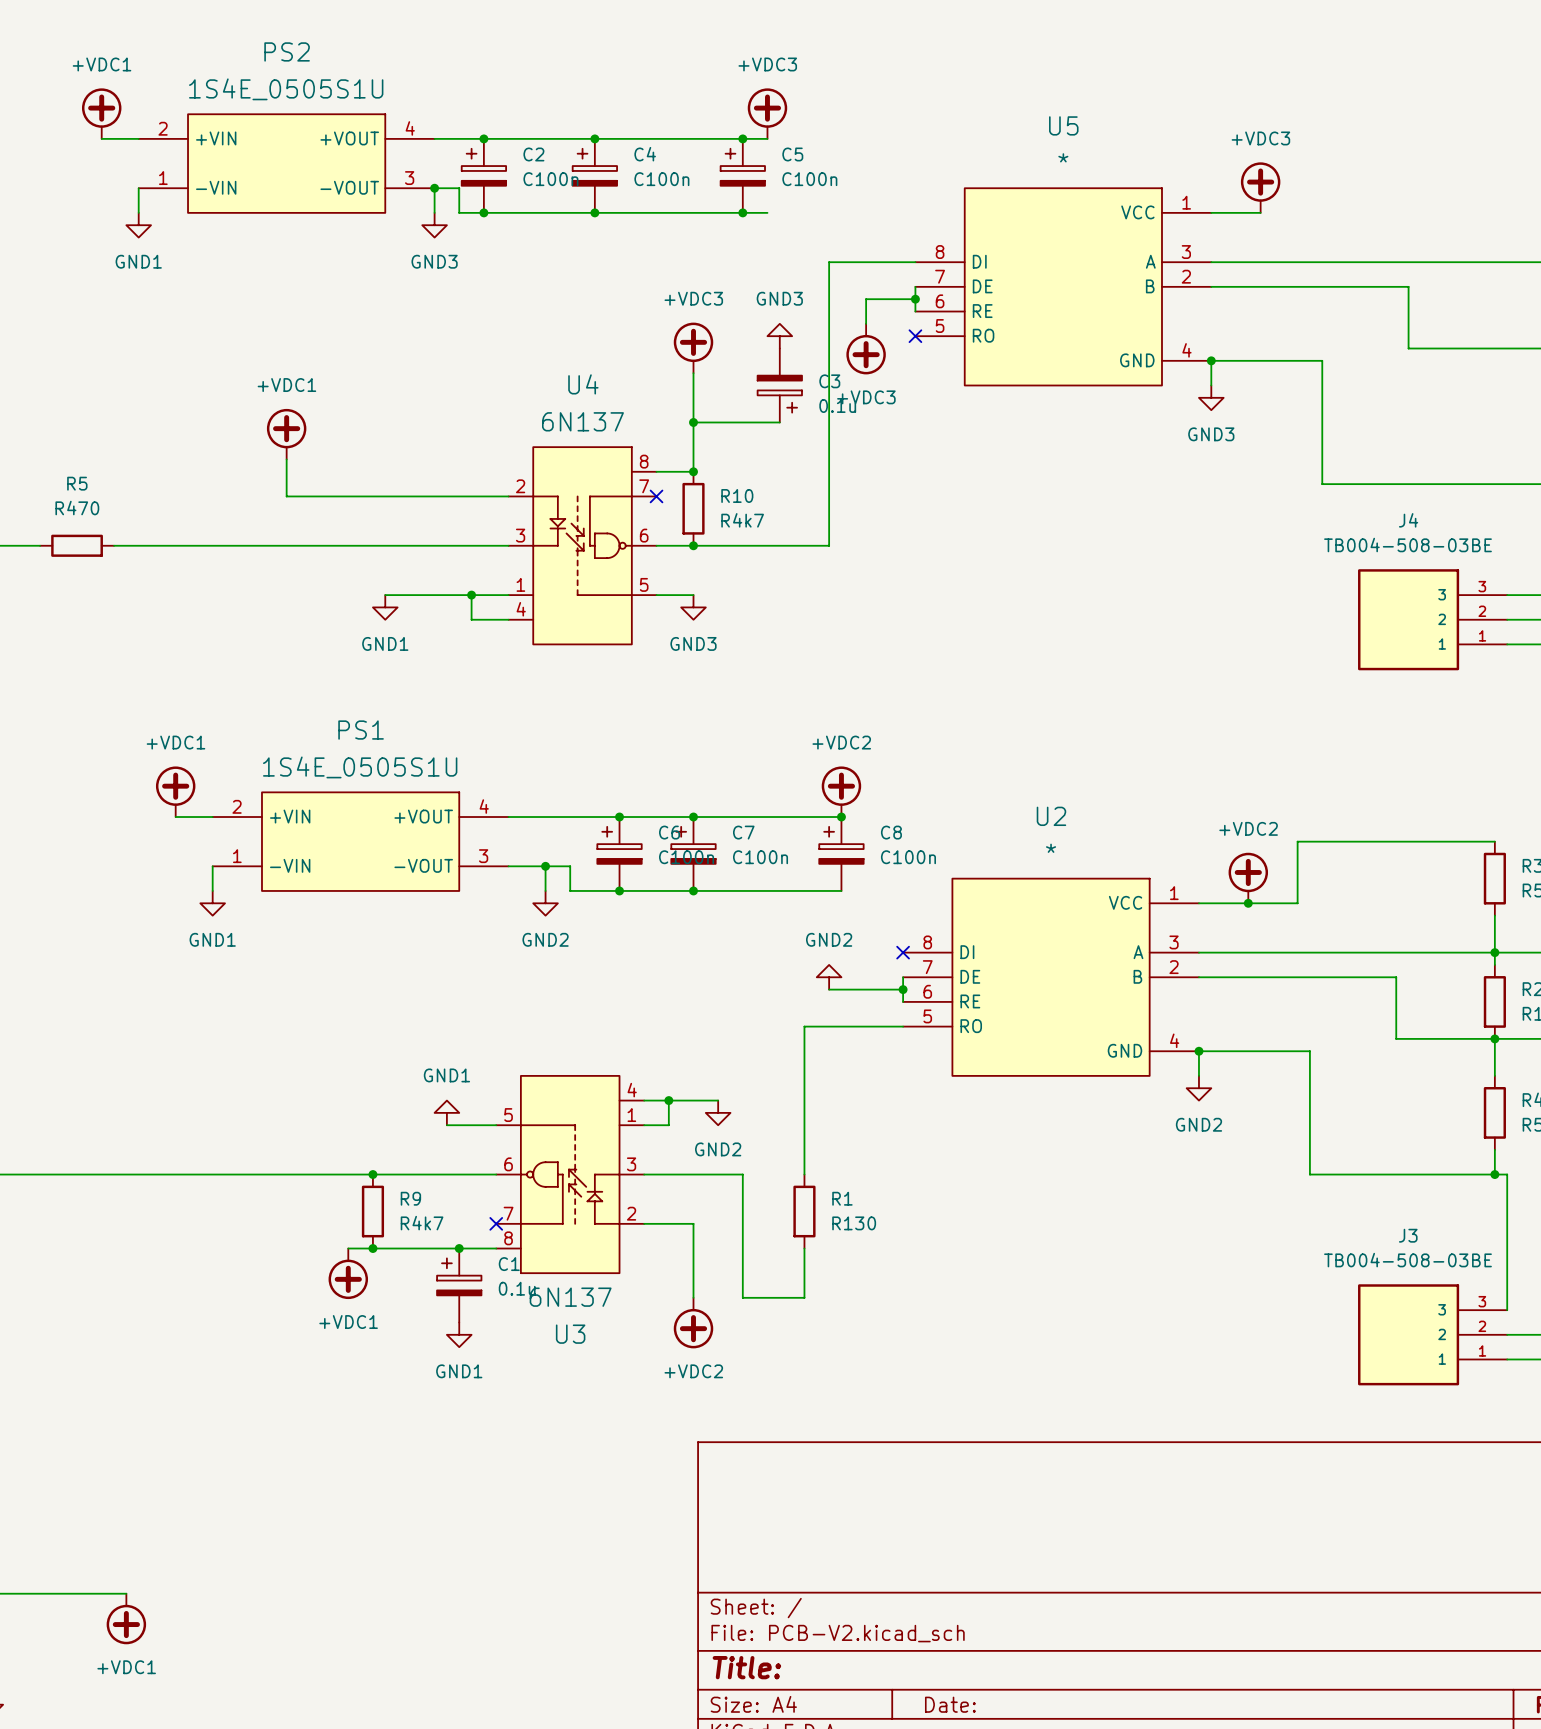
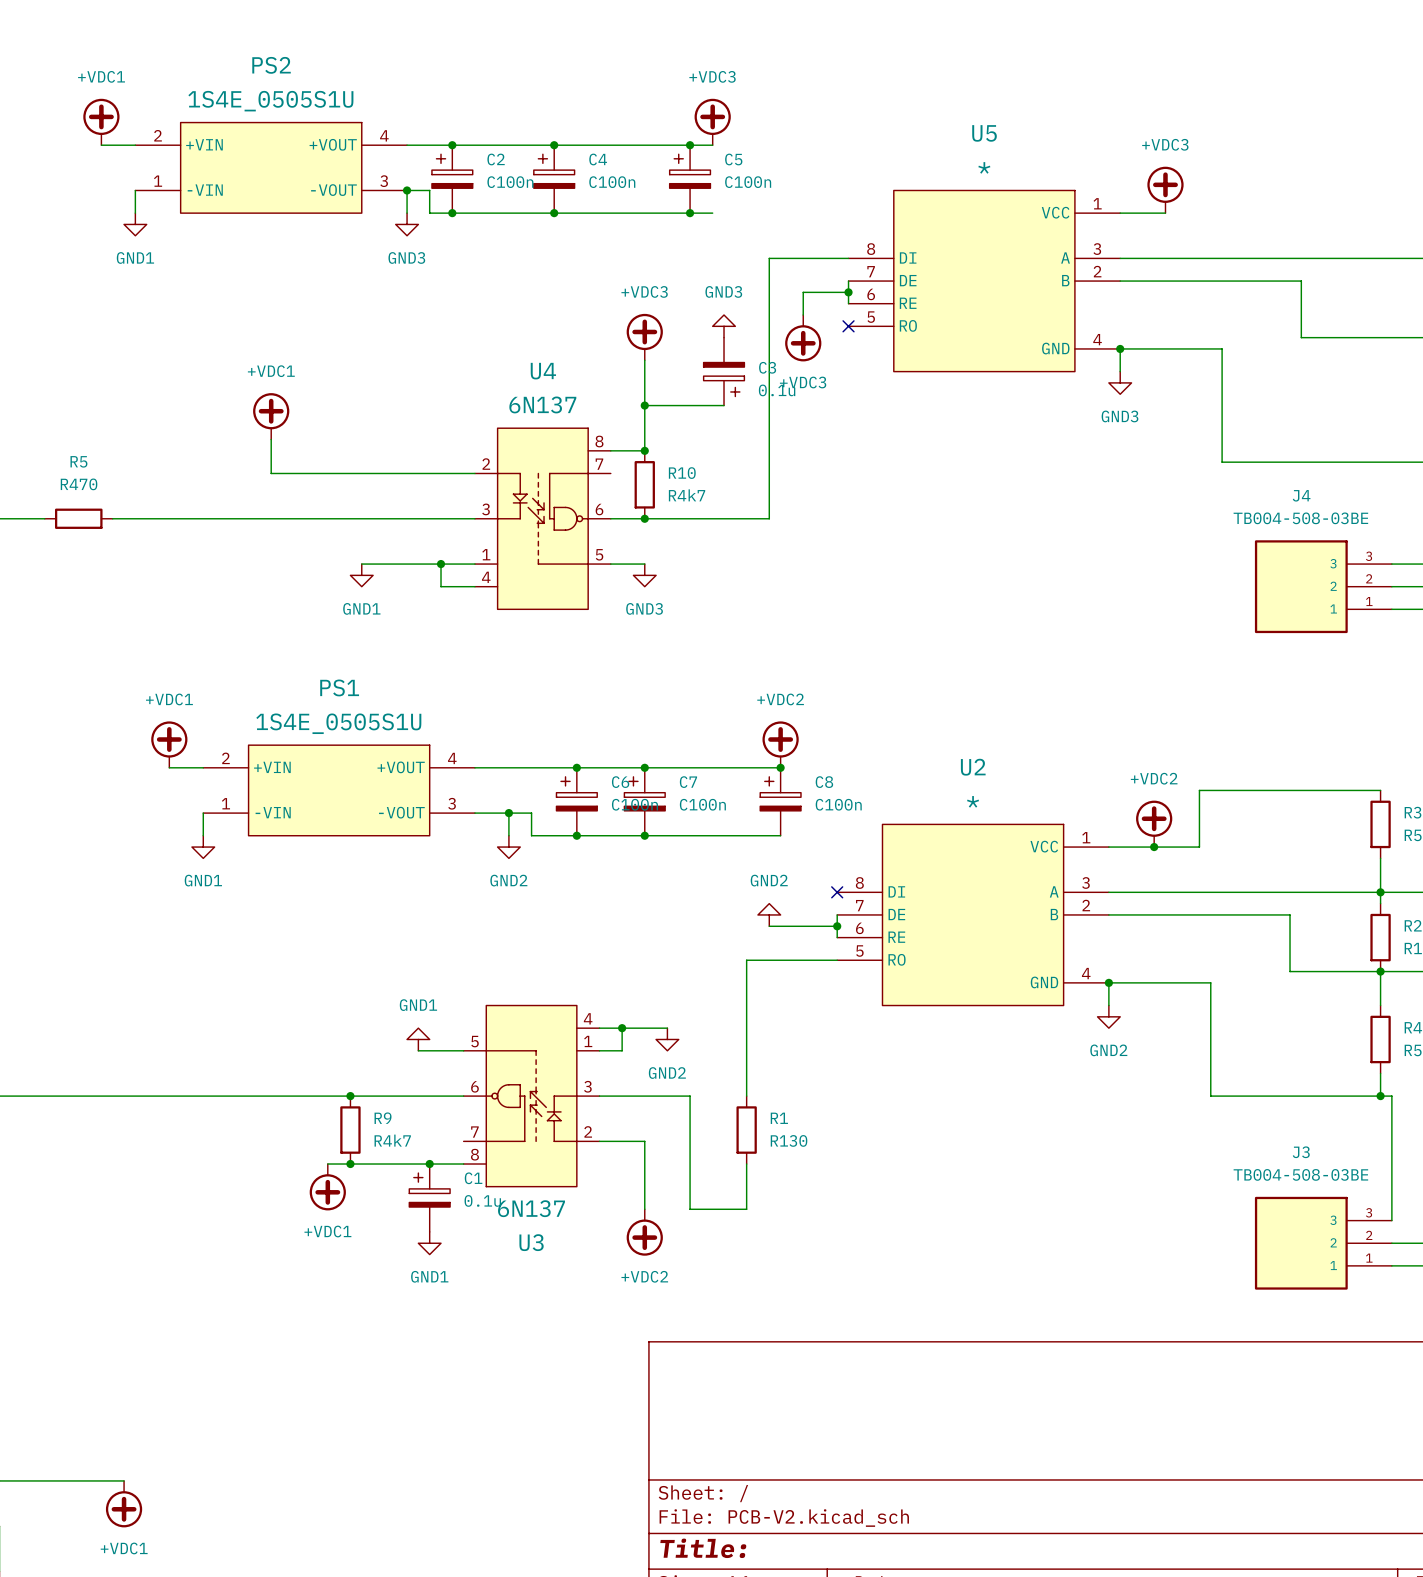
no-connect mark: (656, 496) -> none
no-connect mark: (496, 1223) -> none

